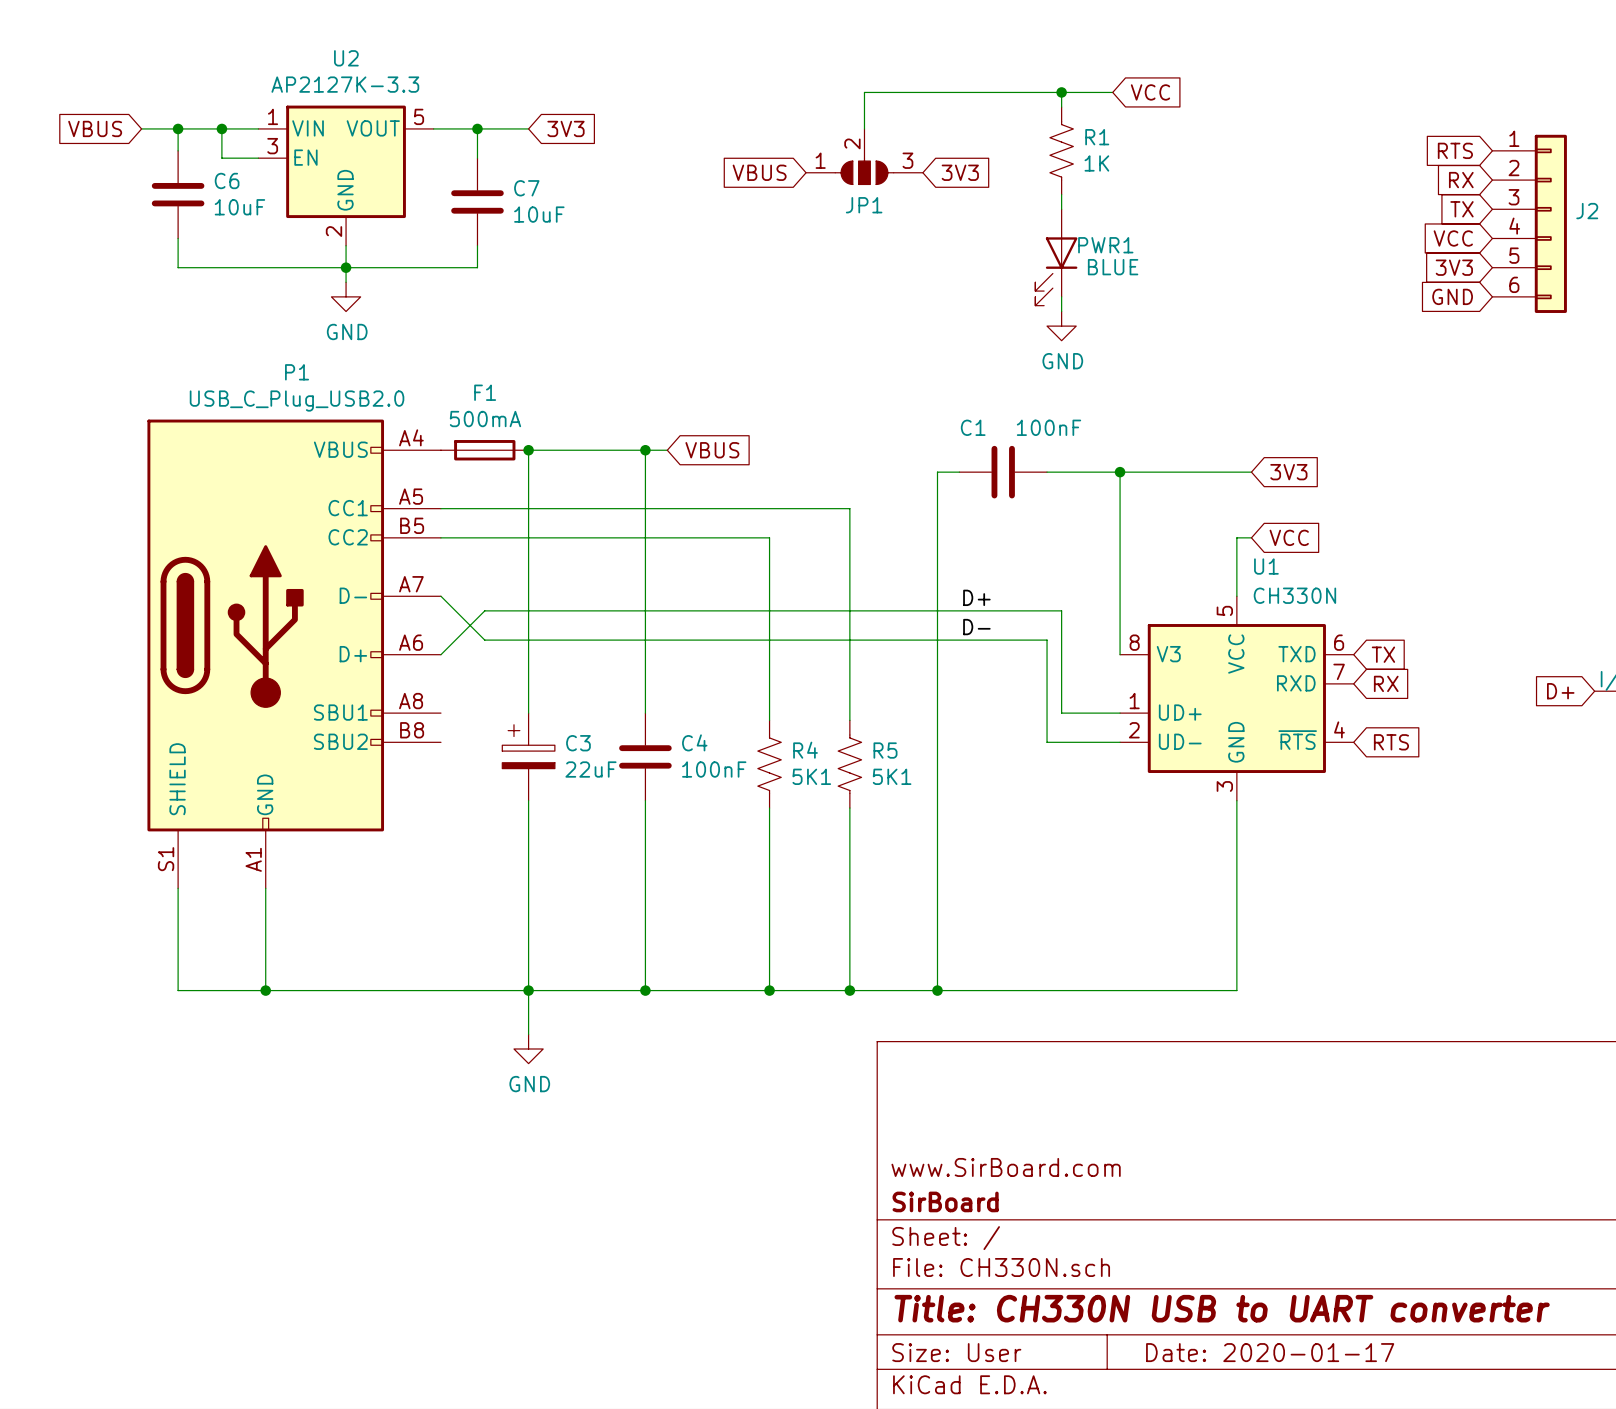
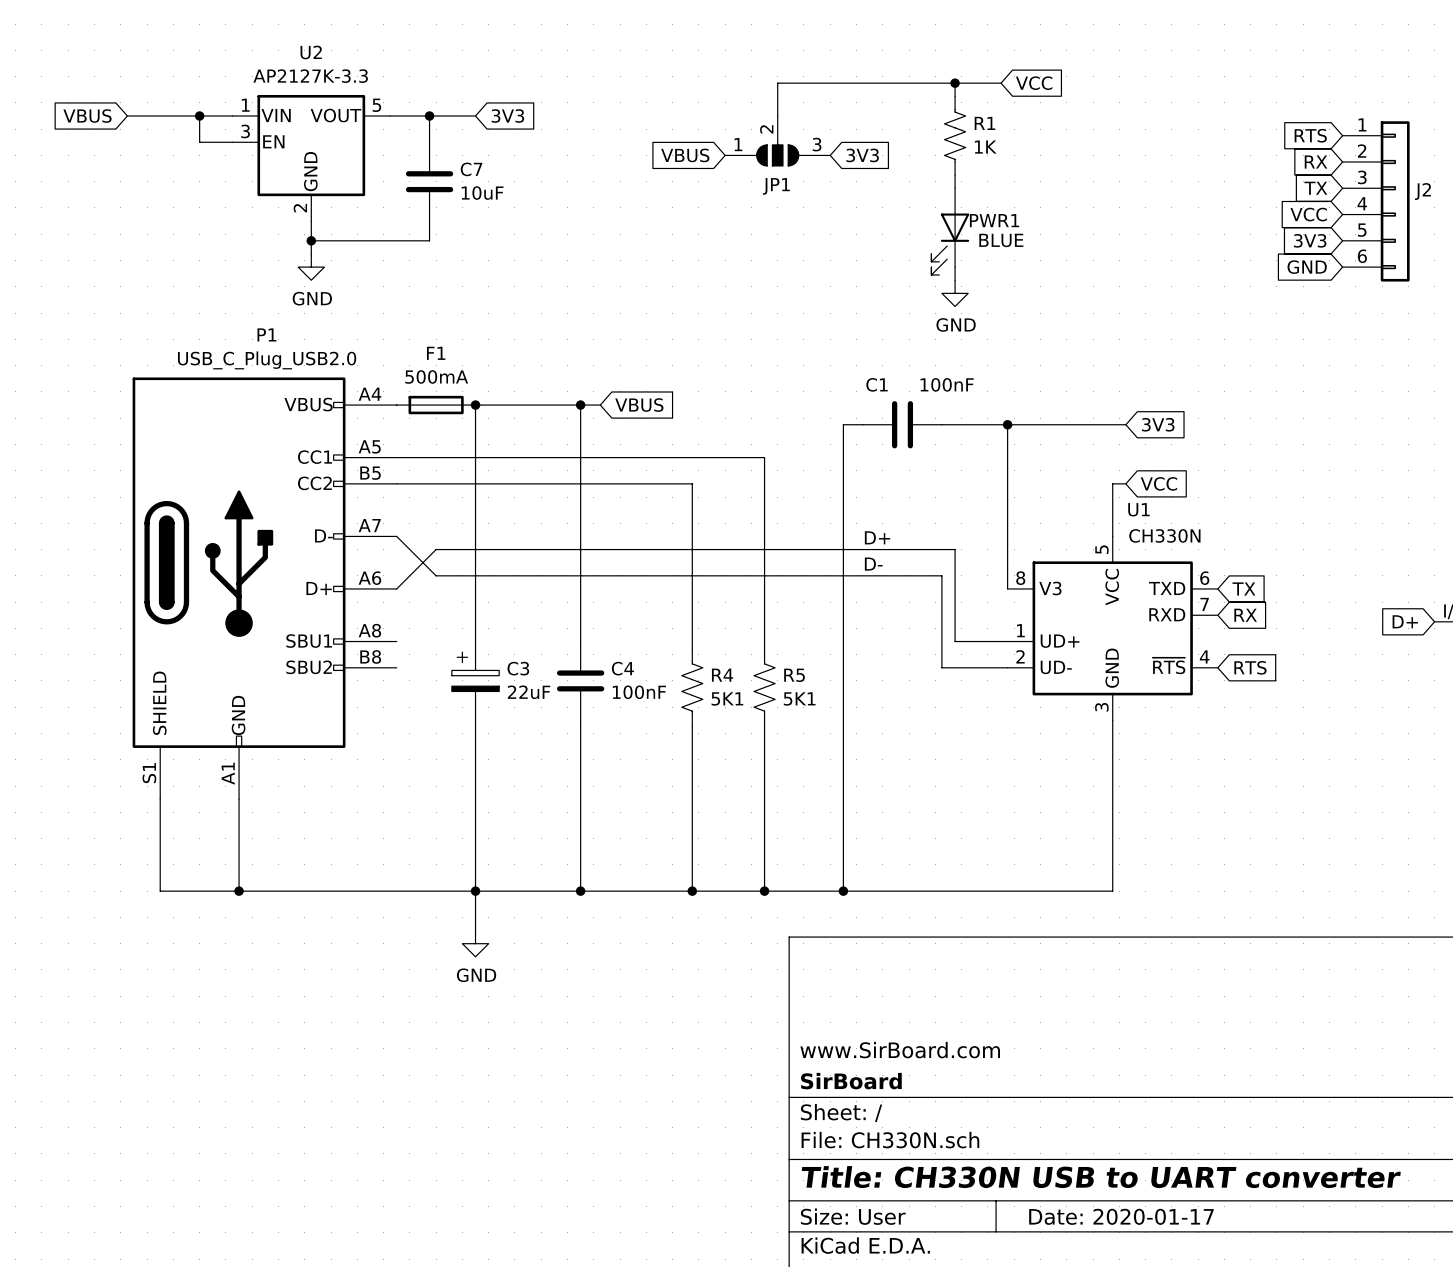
wire: (178, 128) (178, 150) -> none
junction: (178, 128) -> none
C6: 10uF (178, 194) -> none
wire: (178, 238) (178, 267) (346, 267) -> none

